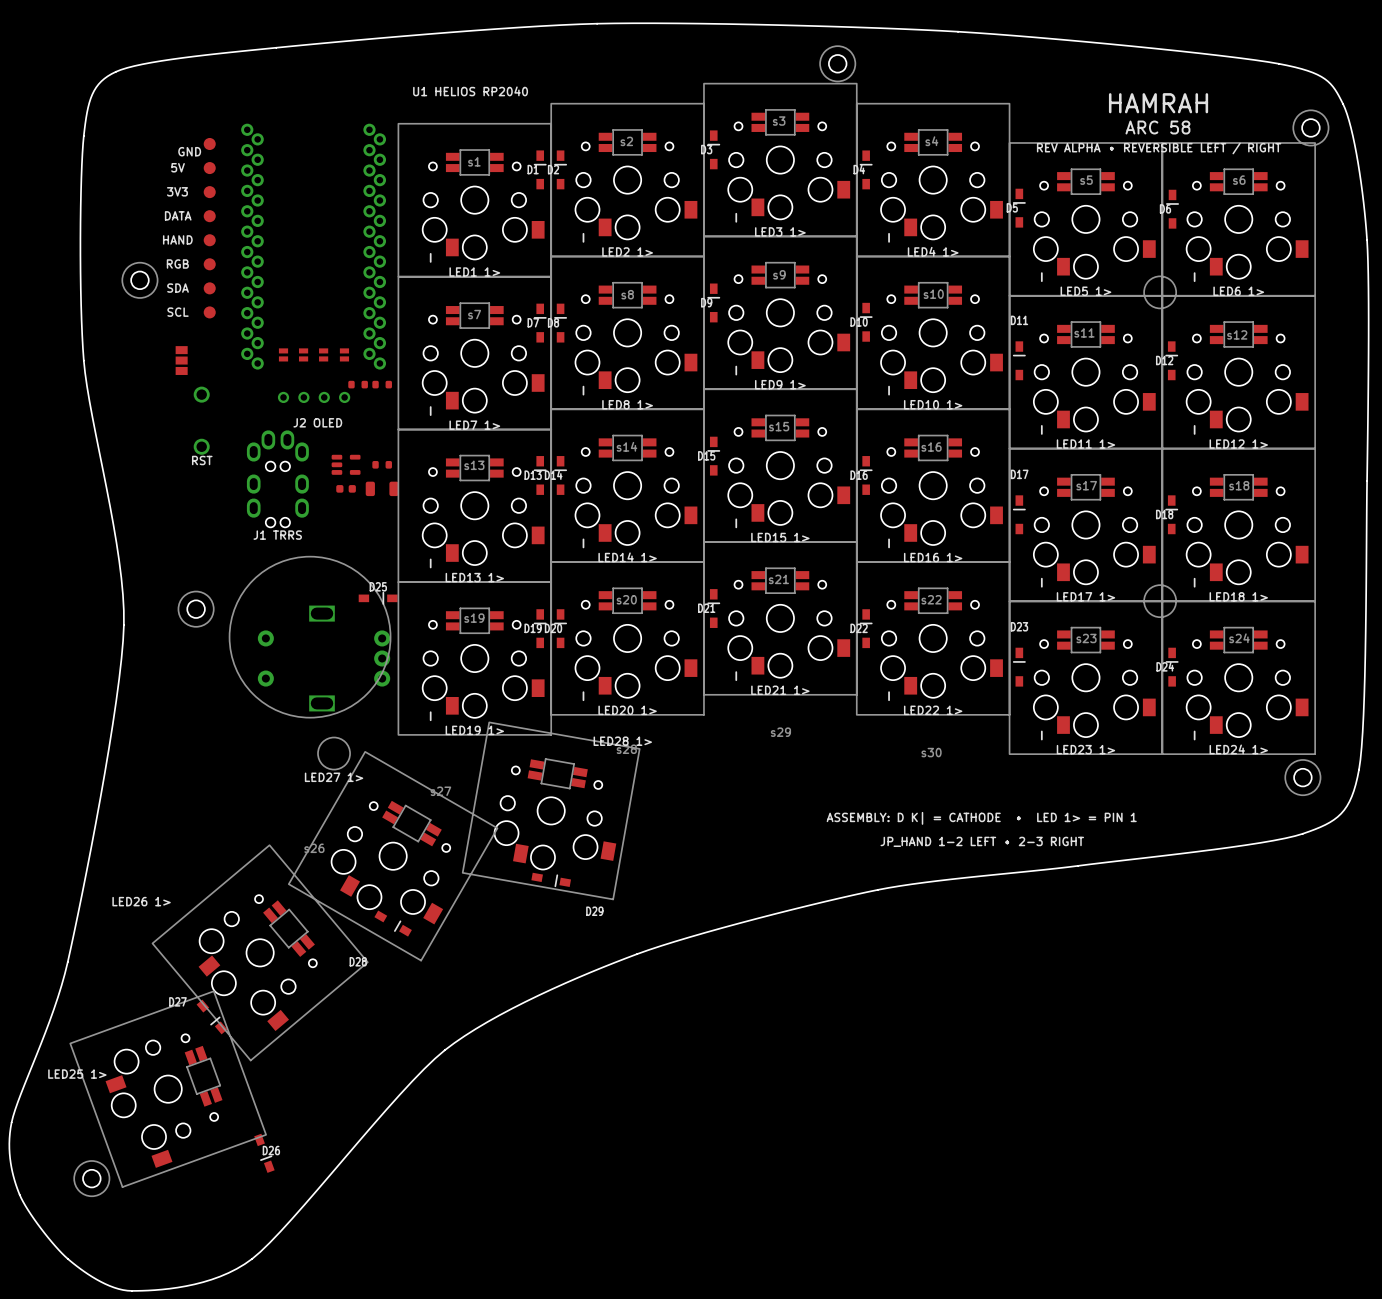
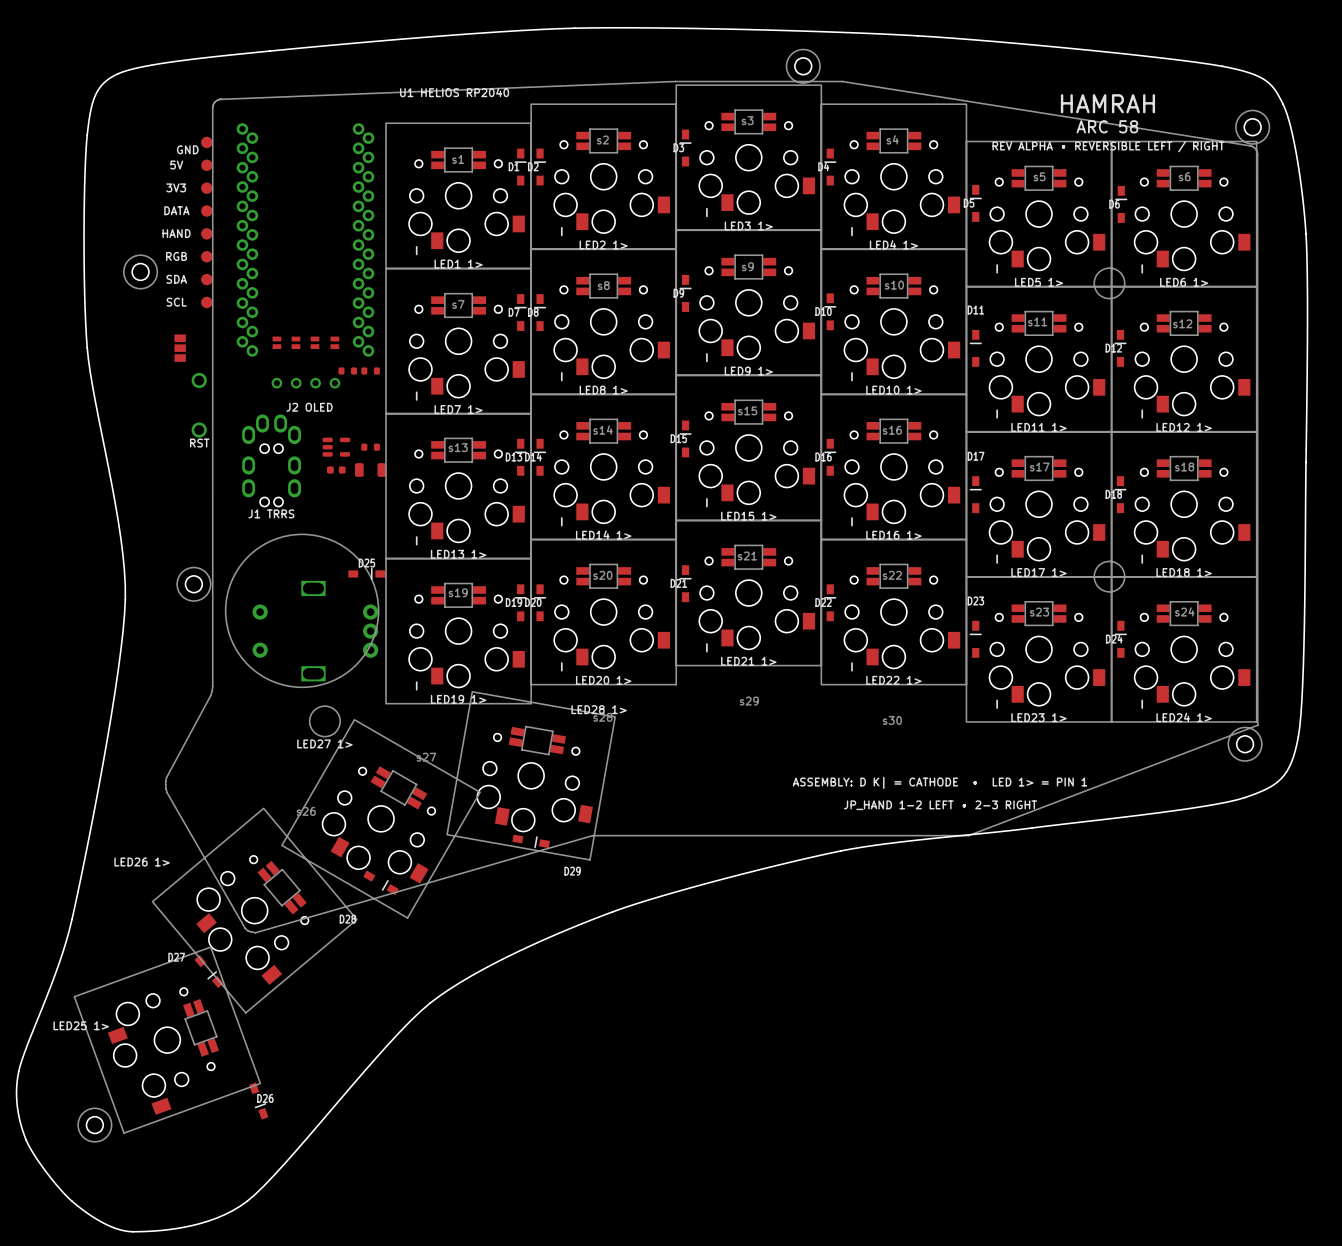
line: none -> (219, 99) (214, 103) (212, 108) (212, 686) (210, 695) (166, 777) (165, 784) (167, 792) (247, 930) (255, 932) (592, 835) (968, 835) (1258, 725)
line: none -> (219, 99) (675, 81) (842, 81) (1253, 146) (1257, 154) (1257, 725)

